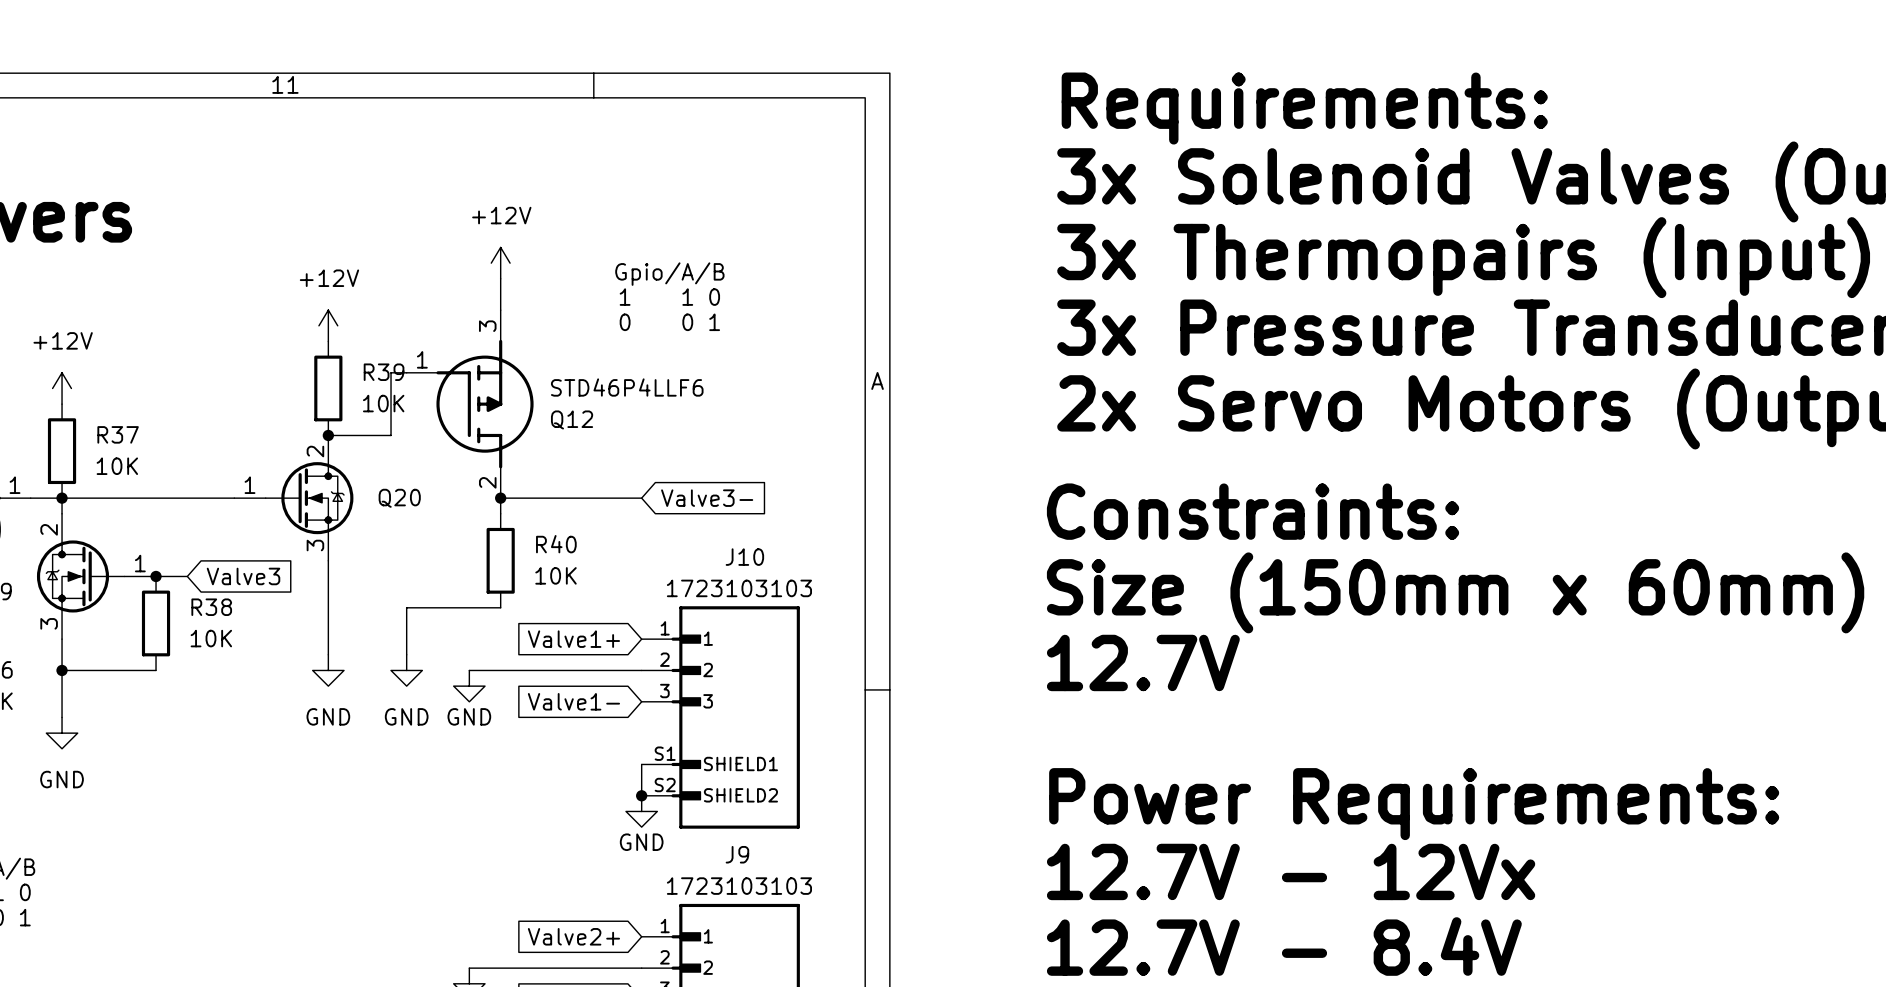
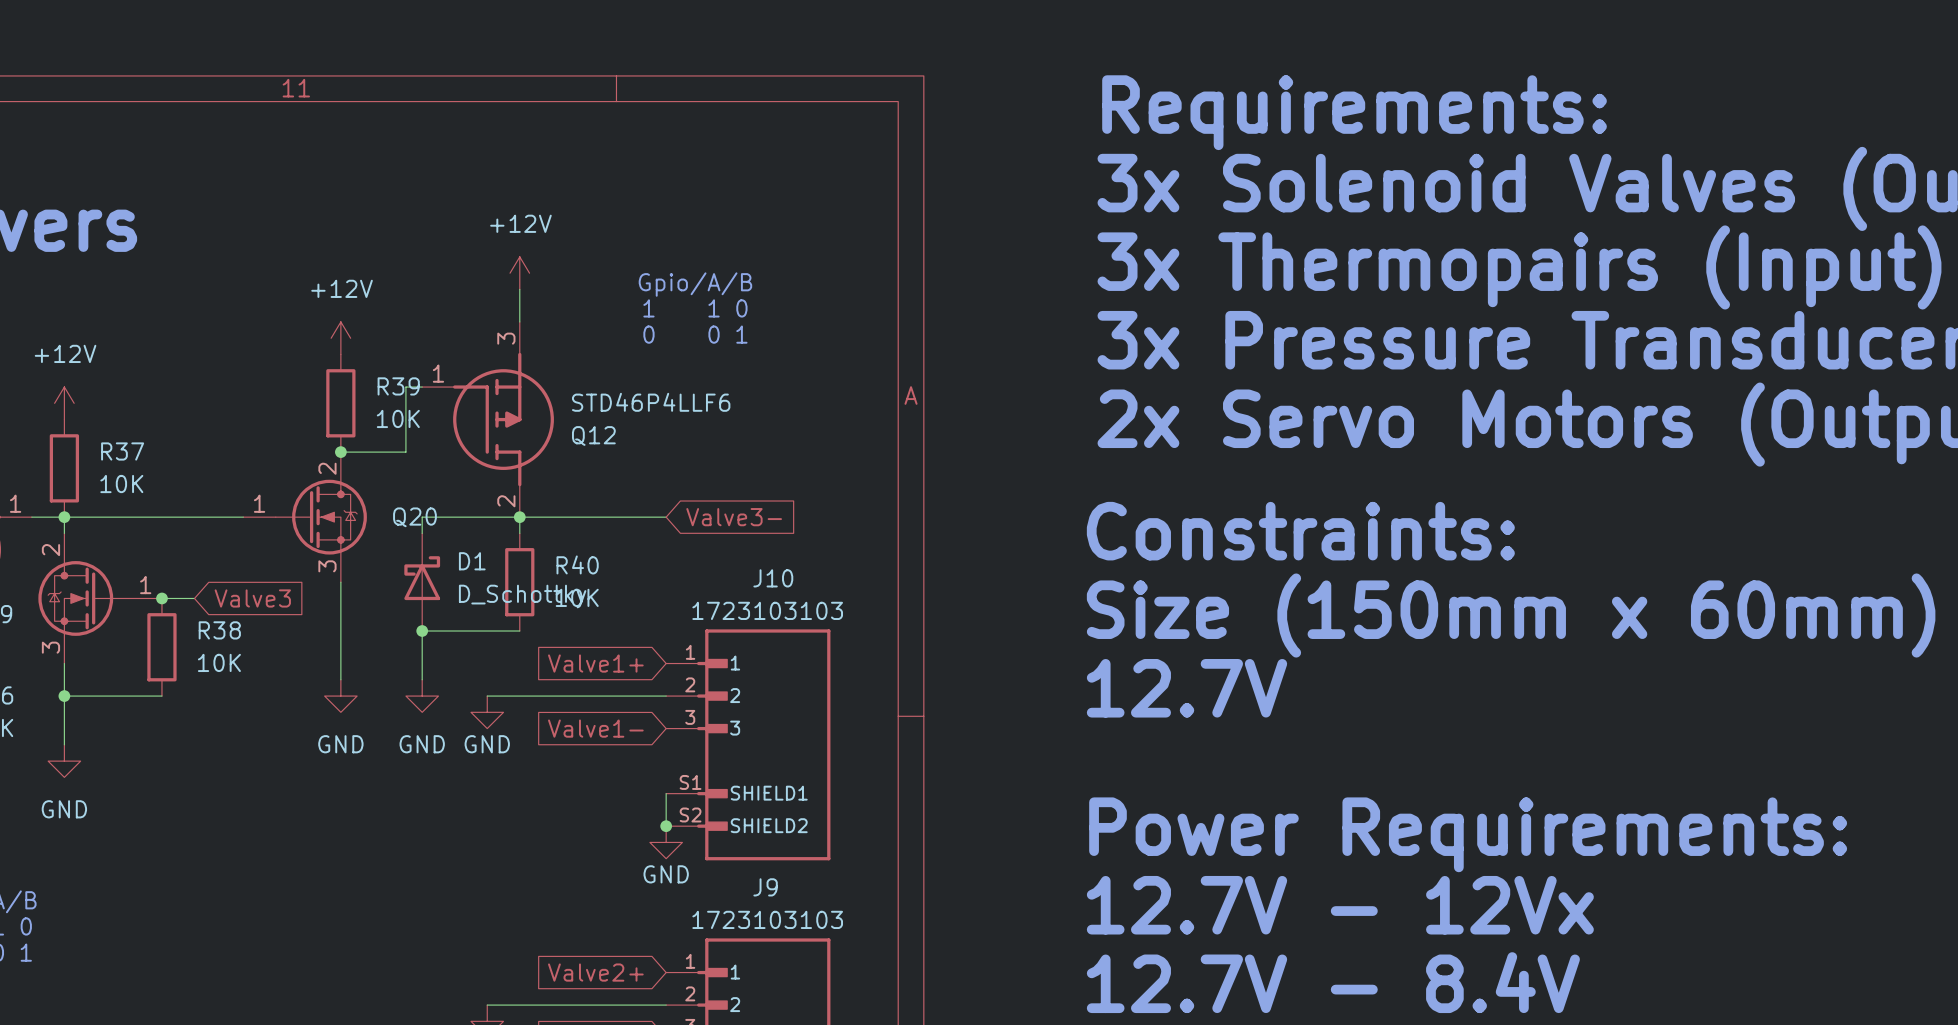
wire: none -> (519, 517) (422, 517) (422, 533)
D1: none -> D_Schottky (422, 582)
junction: none -> (422, 631)

